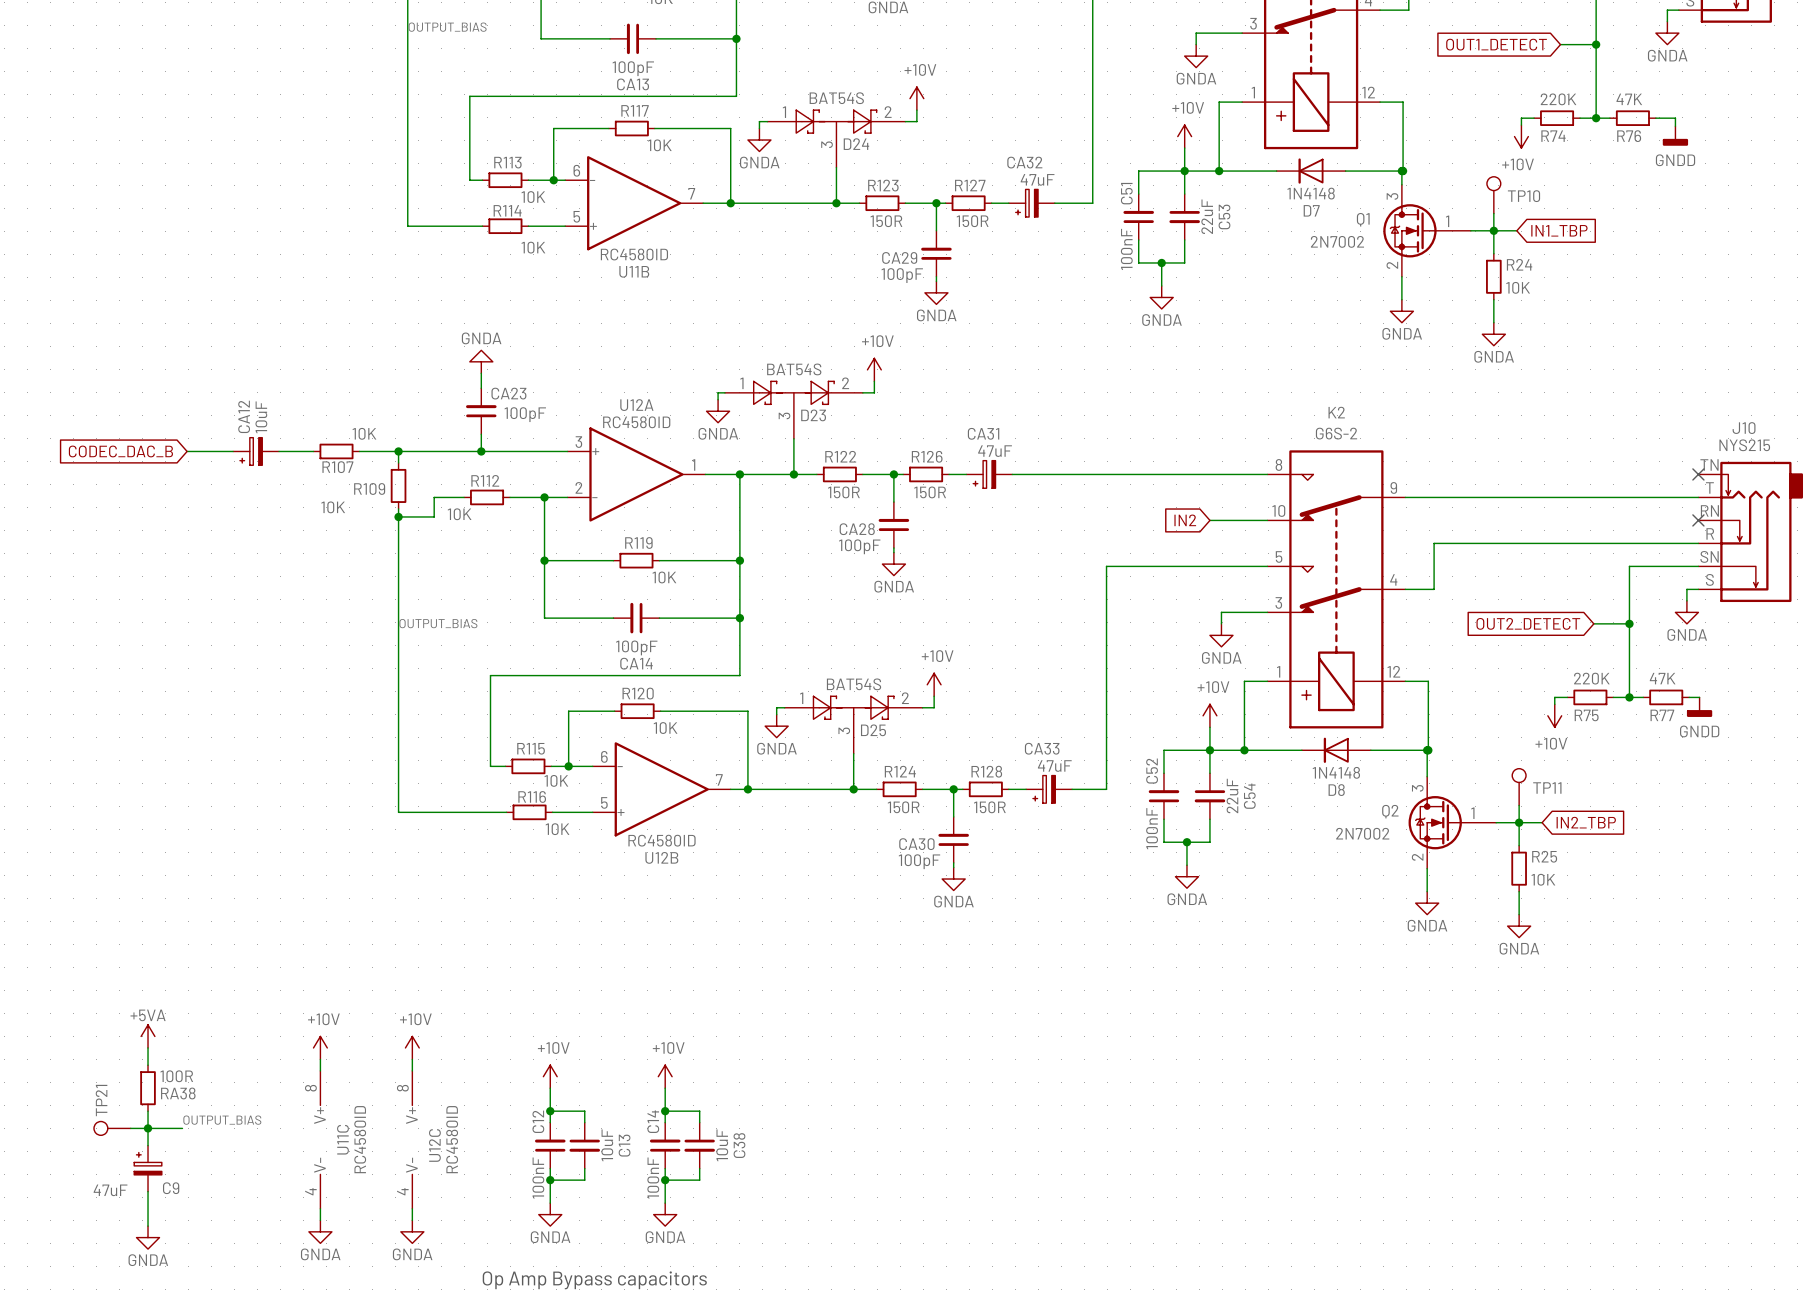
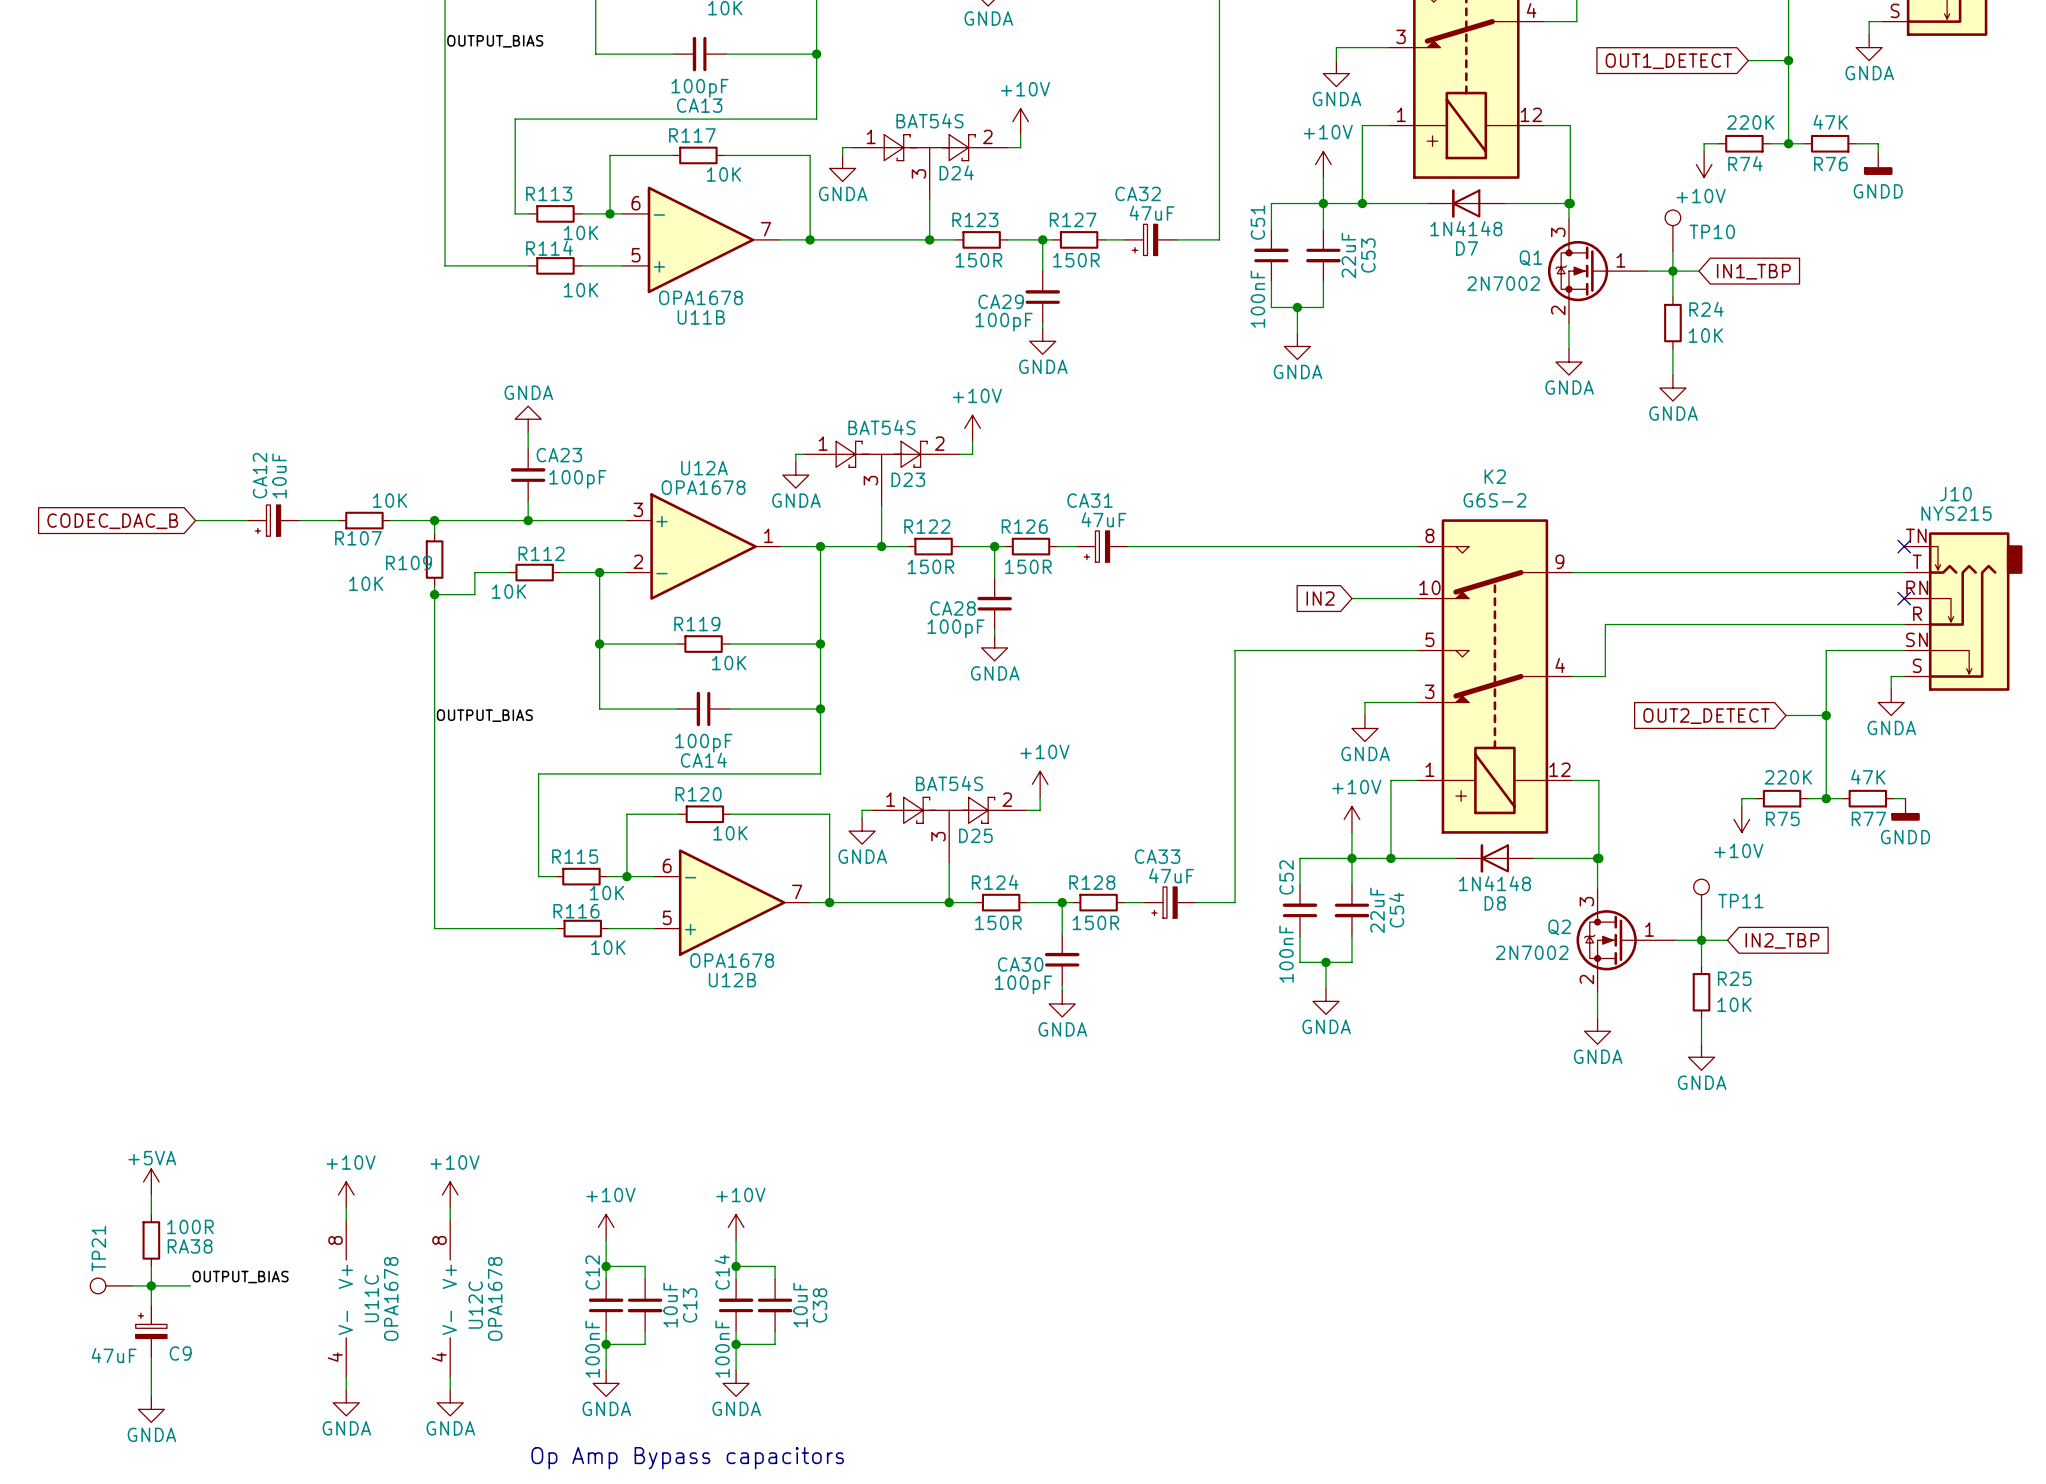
U11B value: RC4580ID (634, 254) -> OPA1678 (700, 297)
U12A value: RC4580ID (636, 422) -> OPA1678 (703, 487)
U12B value: RC4580ID (662, 840) -> OPA1678 (732, 960)
U11C value: RC4580ID (360, 1139) -> OPA1678 (391, 1298)
U12C value: RC4580ID (452, 1139) -> OPA1678 (495, 1298)

